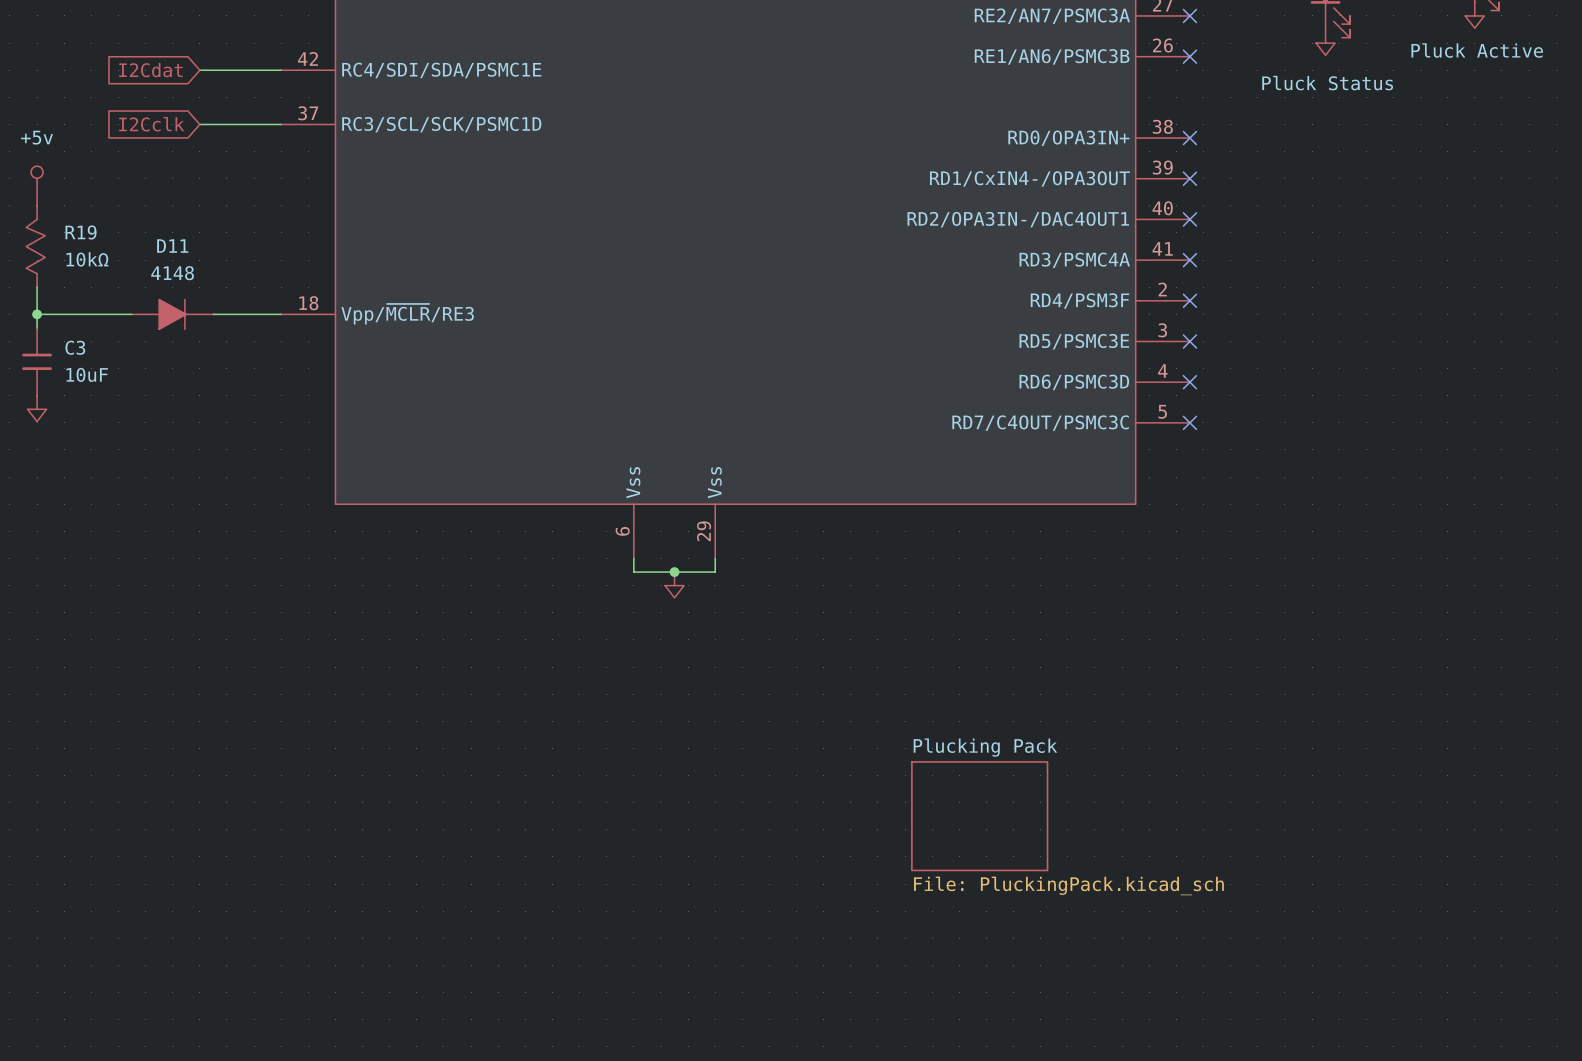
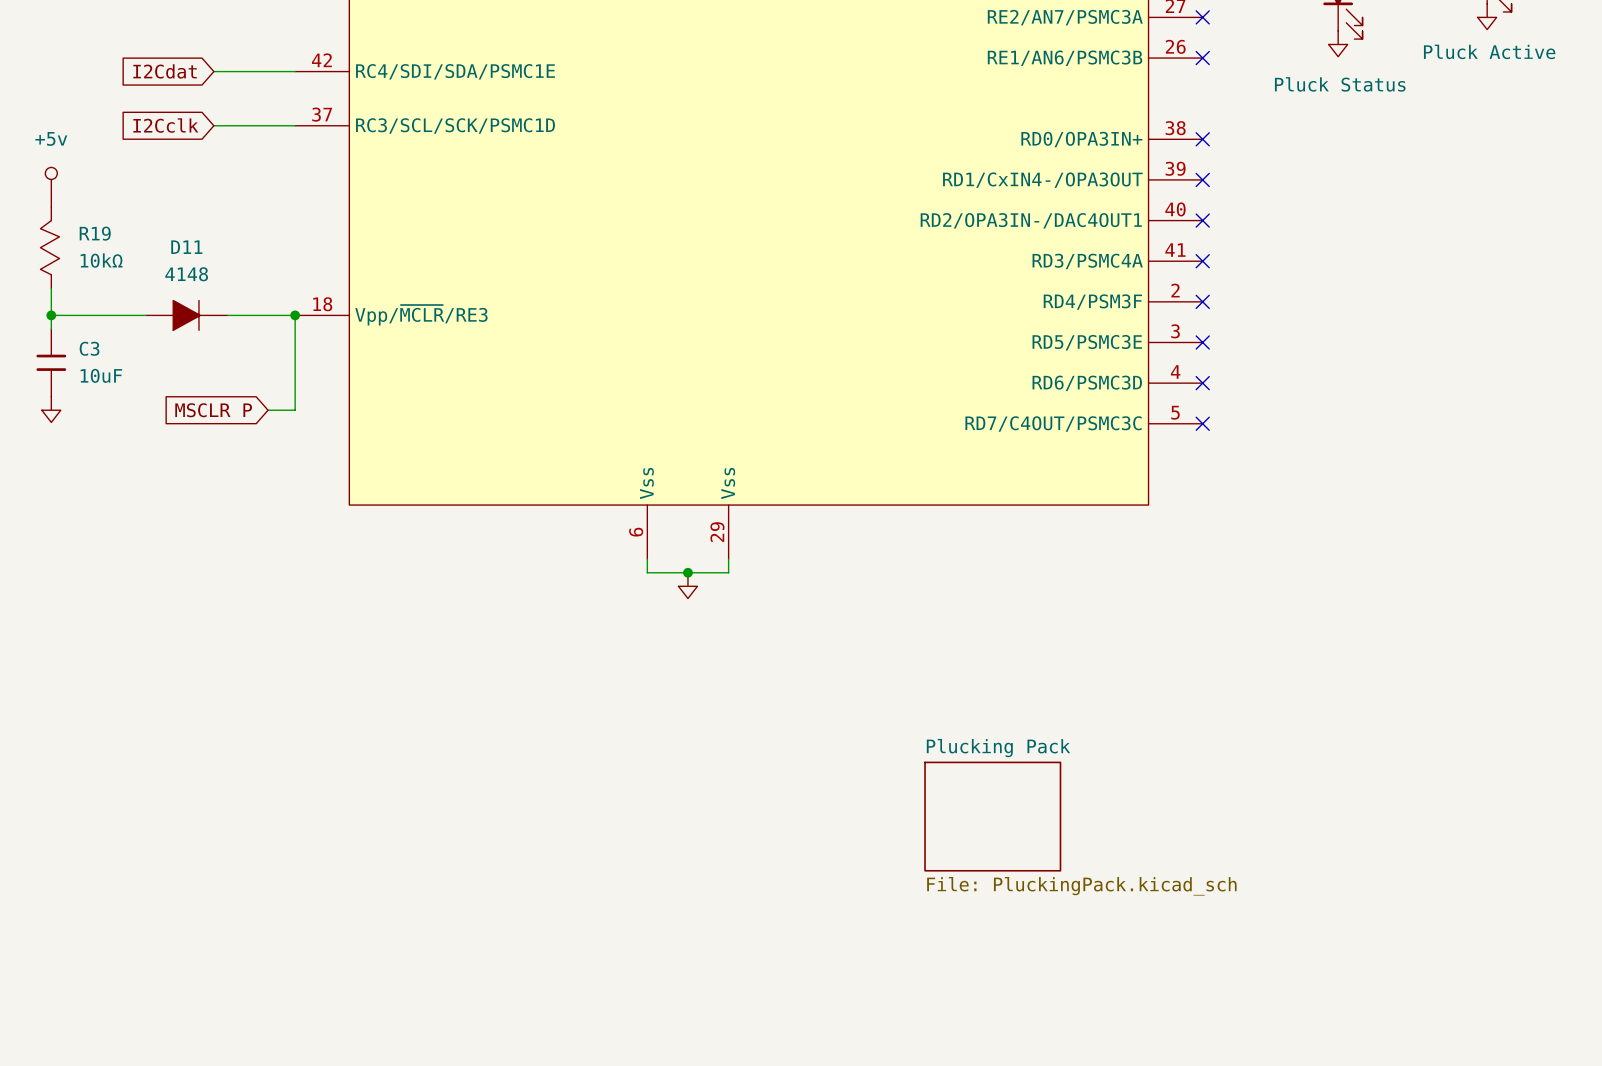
wire: none -> (295, 315) (295, 410) (268, 410)
junction: none -> (295, 315)
global label: none -> MSCLR P (213, 410)

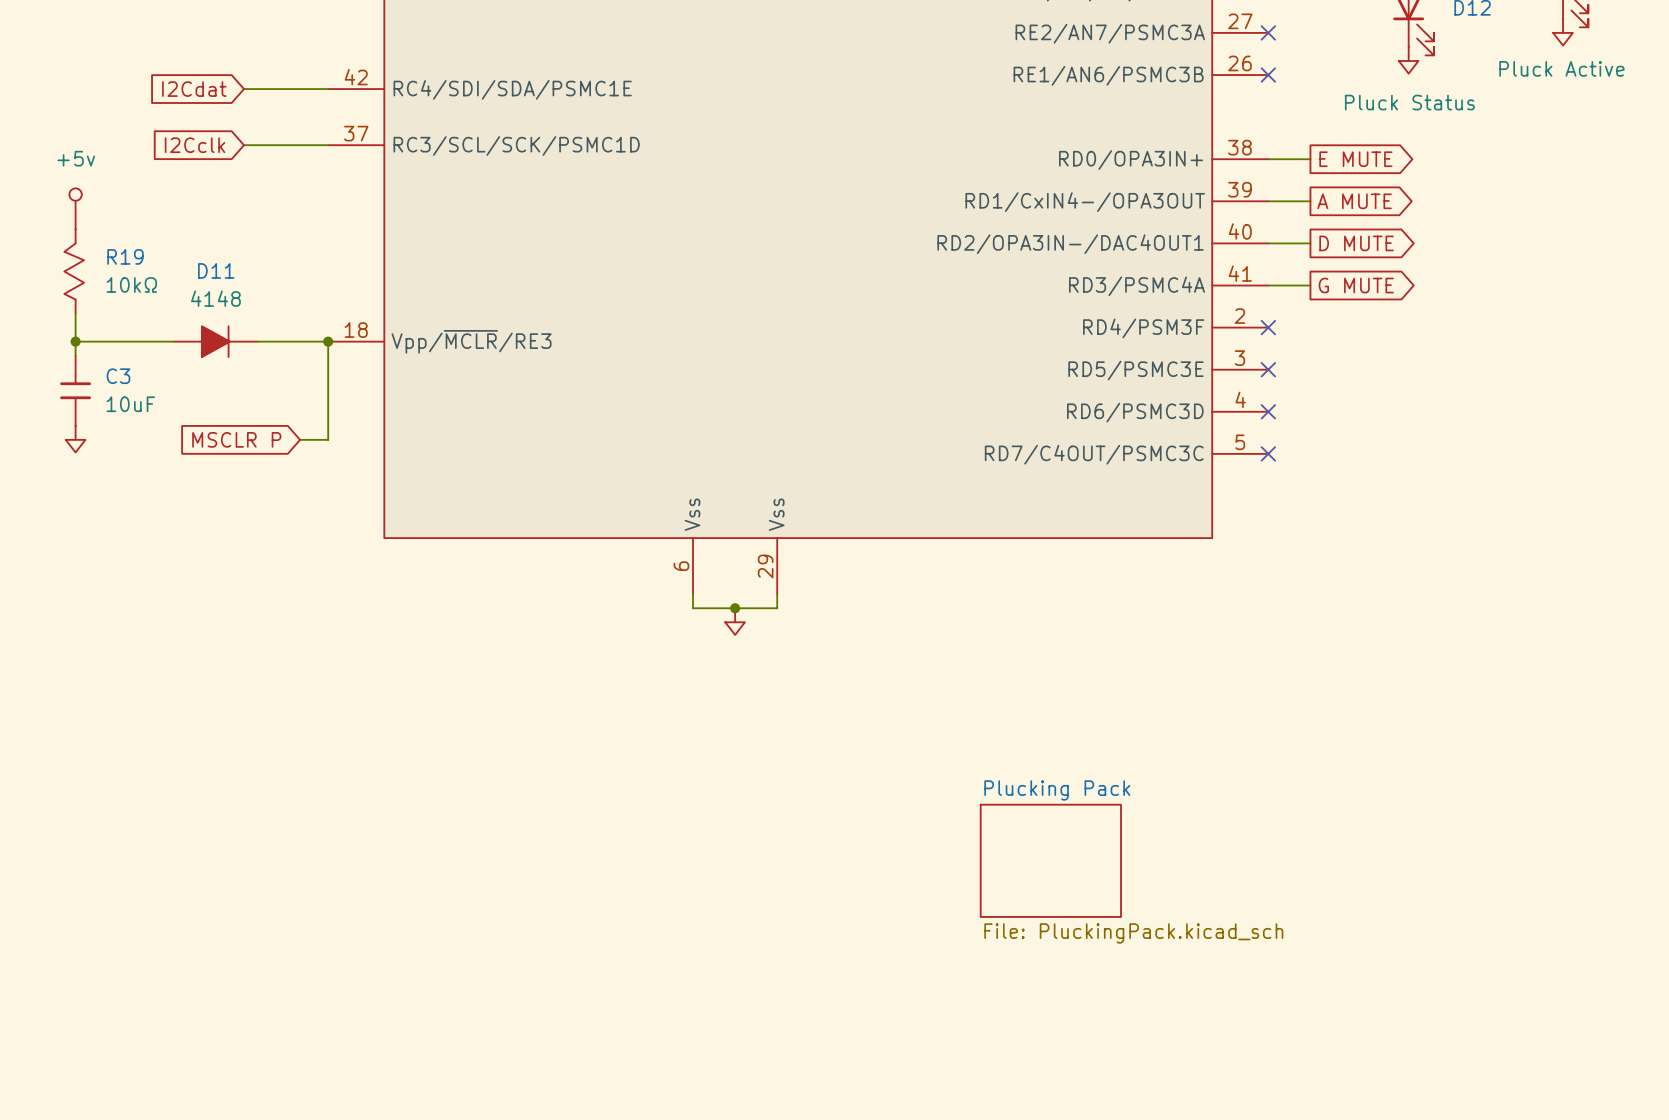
wire: none -> (1268, 159) (1310, 159)
no-connect mark: (1202, 139) -> none
global label: none -> E MUTE (1355, 159)
wire: none -> (1268, 201) (1310, 201)
no-connect mark: (1202, 179) -> none
global label: none -> A MUTE (1354, 201)
wire: none -> (1268, 243) (1310, 243)
no-connect mark: (1202, 220) -> none
global label: none -> D MUTE (1356, 243)
wire: none -> (1268, 285) (1310, 285)
no-connect mark: (1202, 261) -> none
global label: none -> G MUTE (1356, 285)

